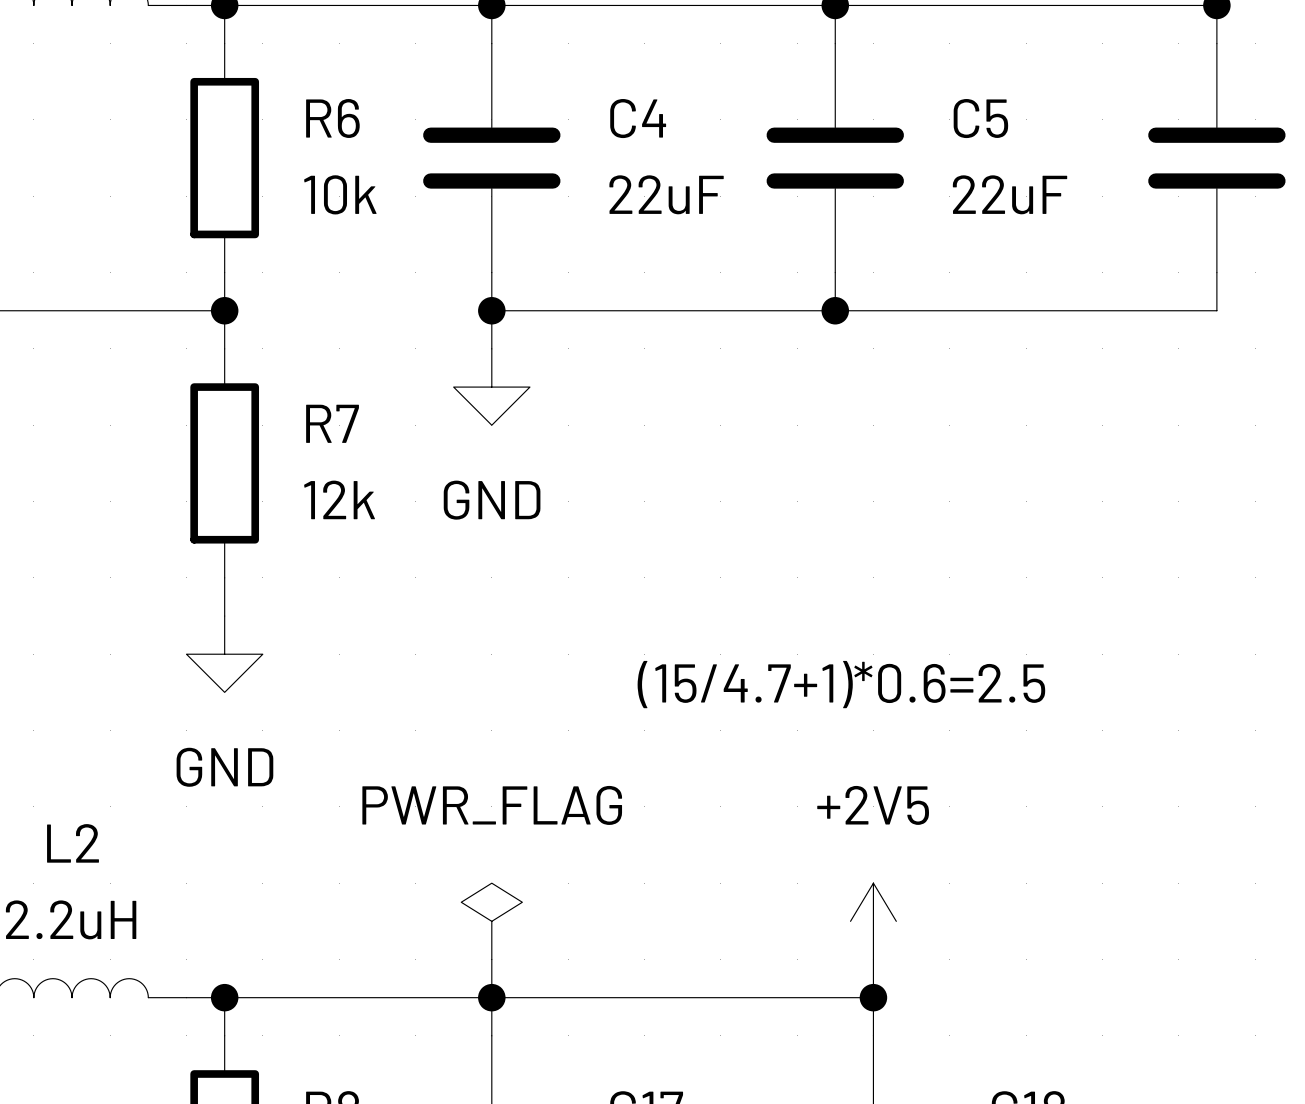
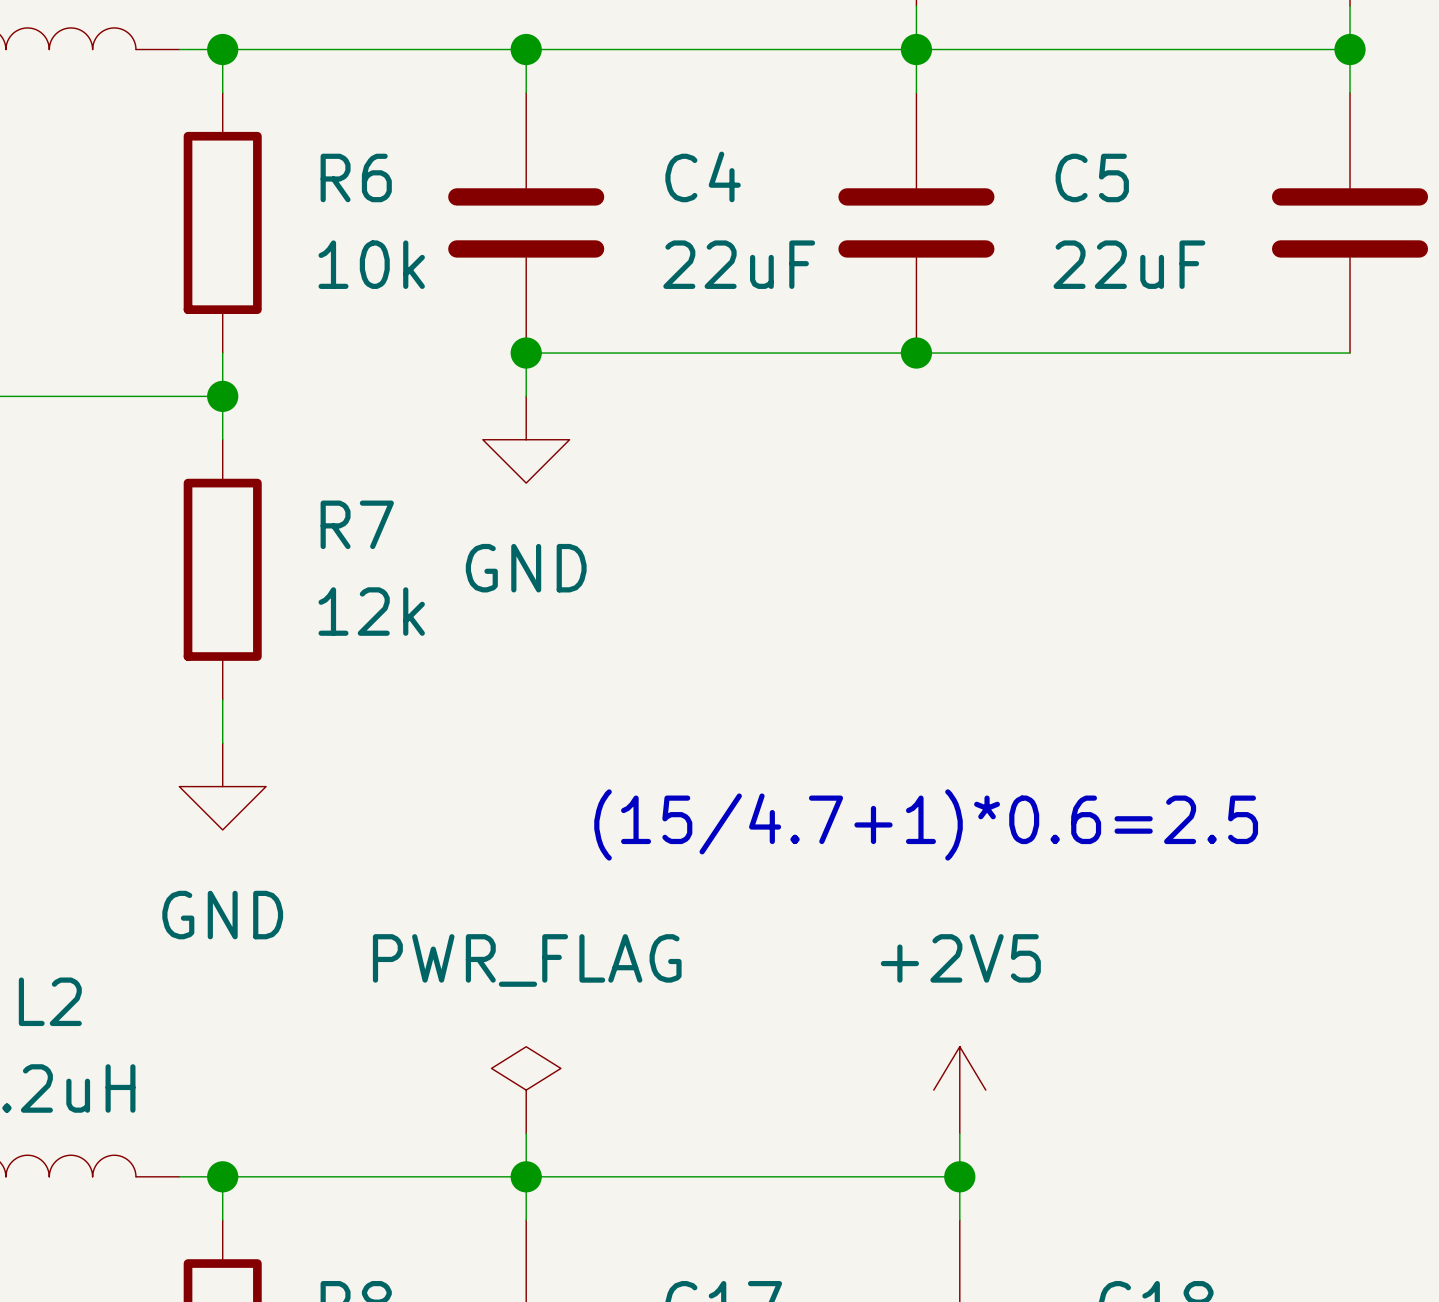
wire: (835, 272) (835, 310) -> none
wire: (1216, 272) (1216, 310) (491, 310) (491, 348) -> (1350, 353) (526, 353)
junction position: (491, 310) -> (526, 353)
junction position: (835, 310) -> (916, 353)
power symbol position: GND (491, 387) -> GND (526, 439)

